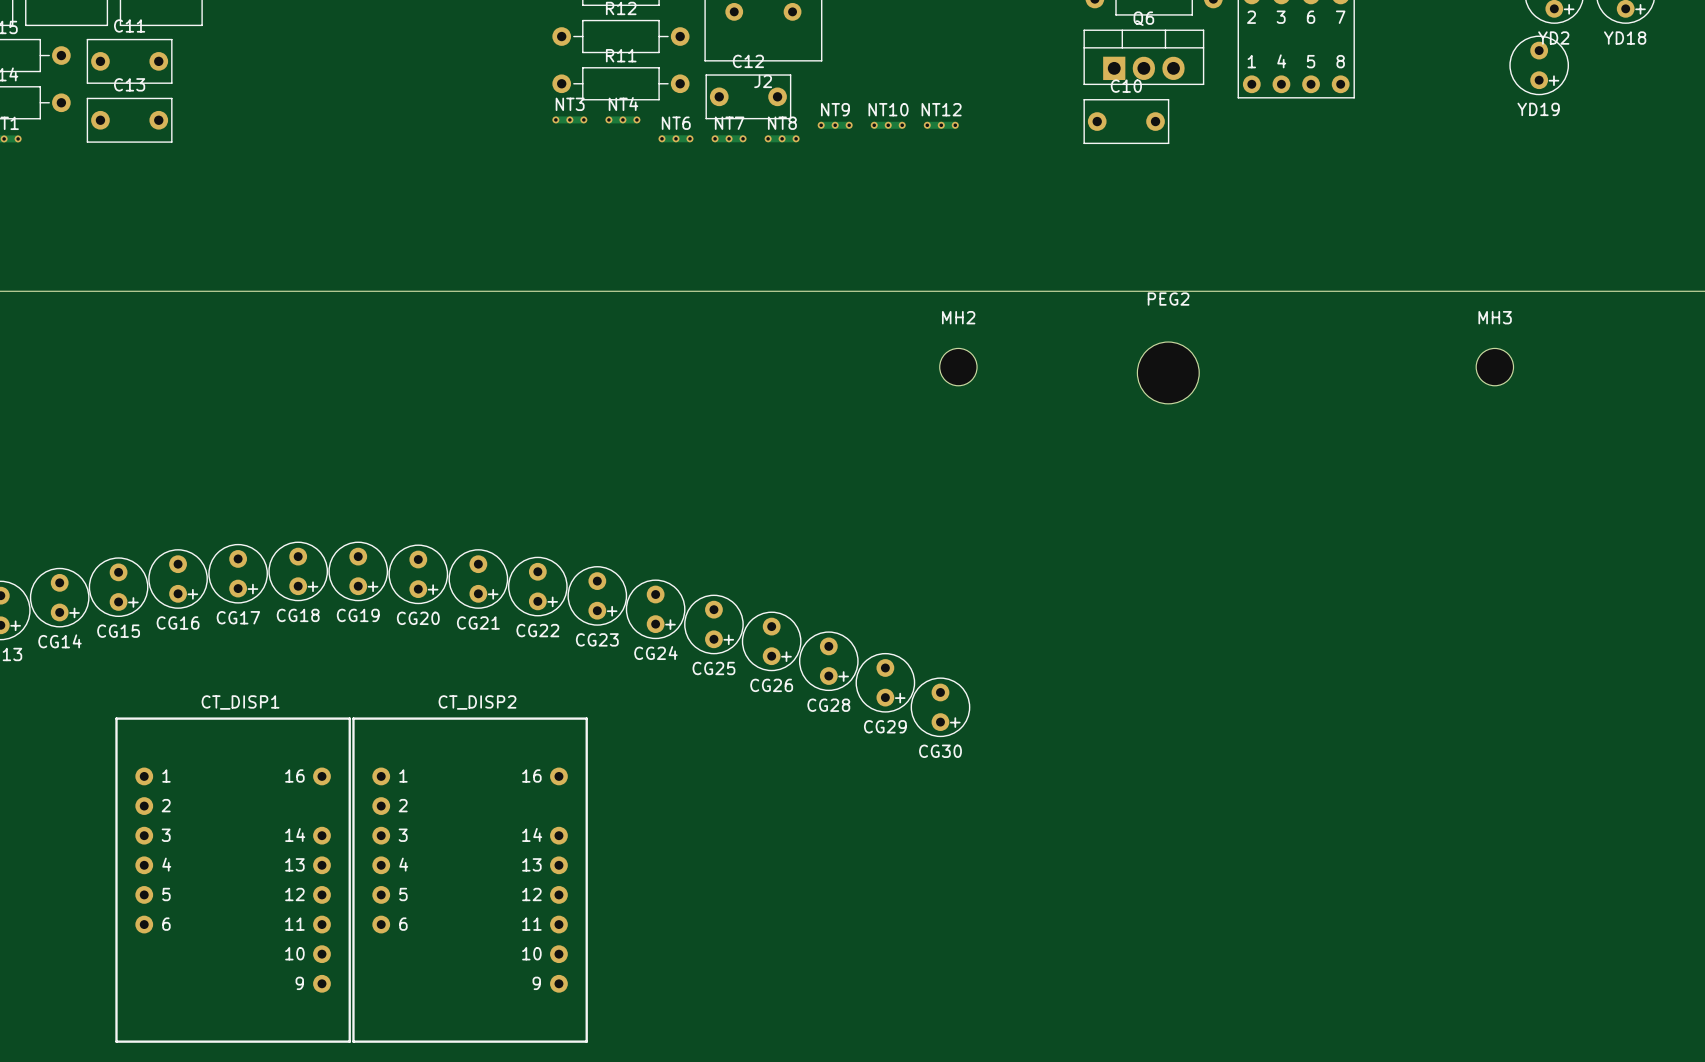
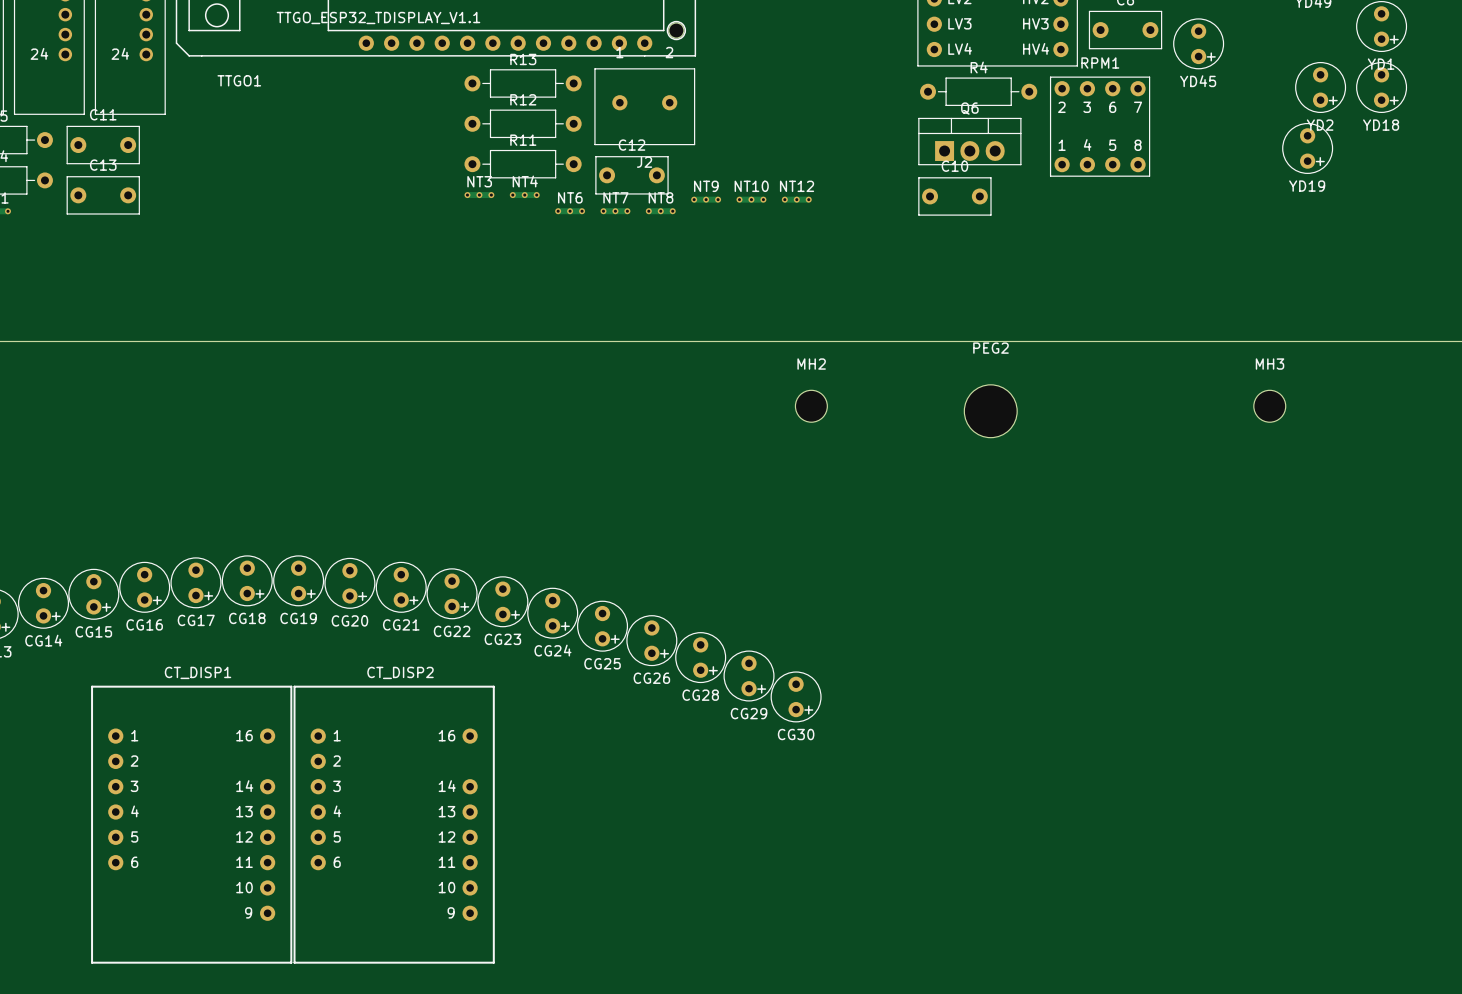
CT_DISP1 position: (233, 880) -> (191, 824)
CT_DISP2 position: (470, 880) -> (394, 824)

